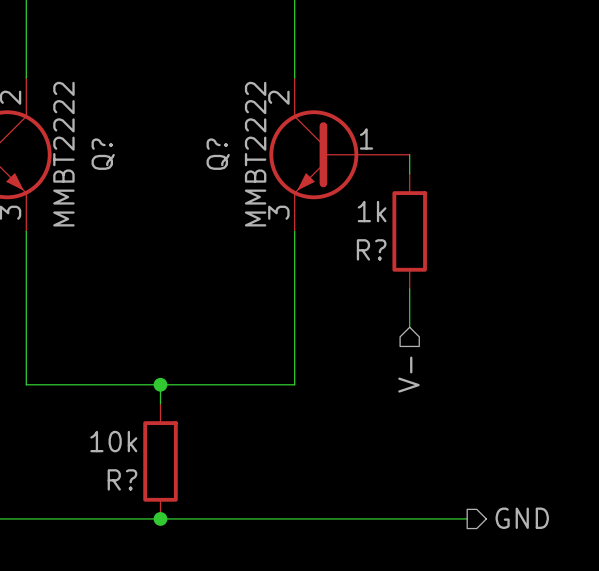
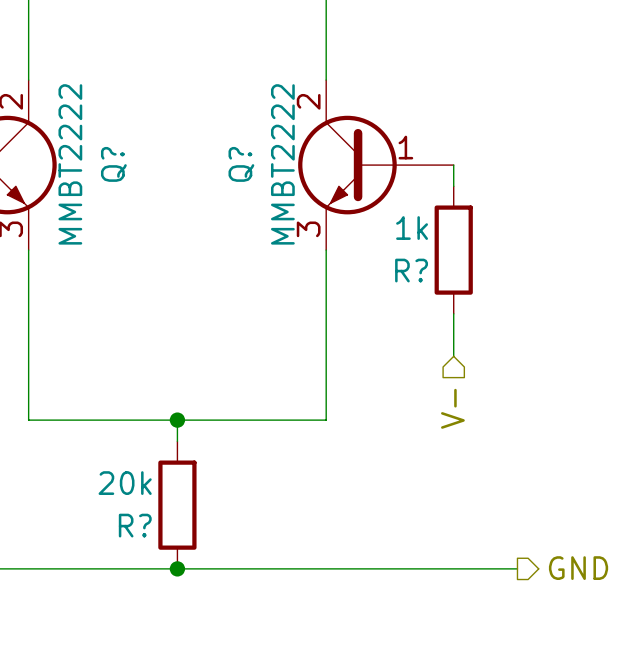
R? value: 10k (113, 441) -> 20k (125, 483)

